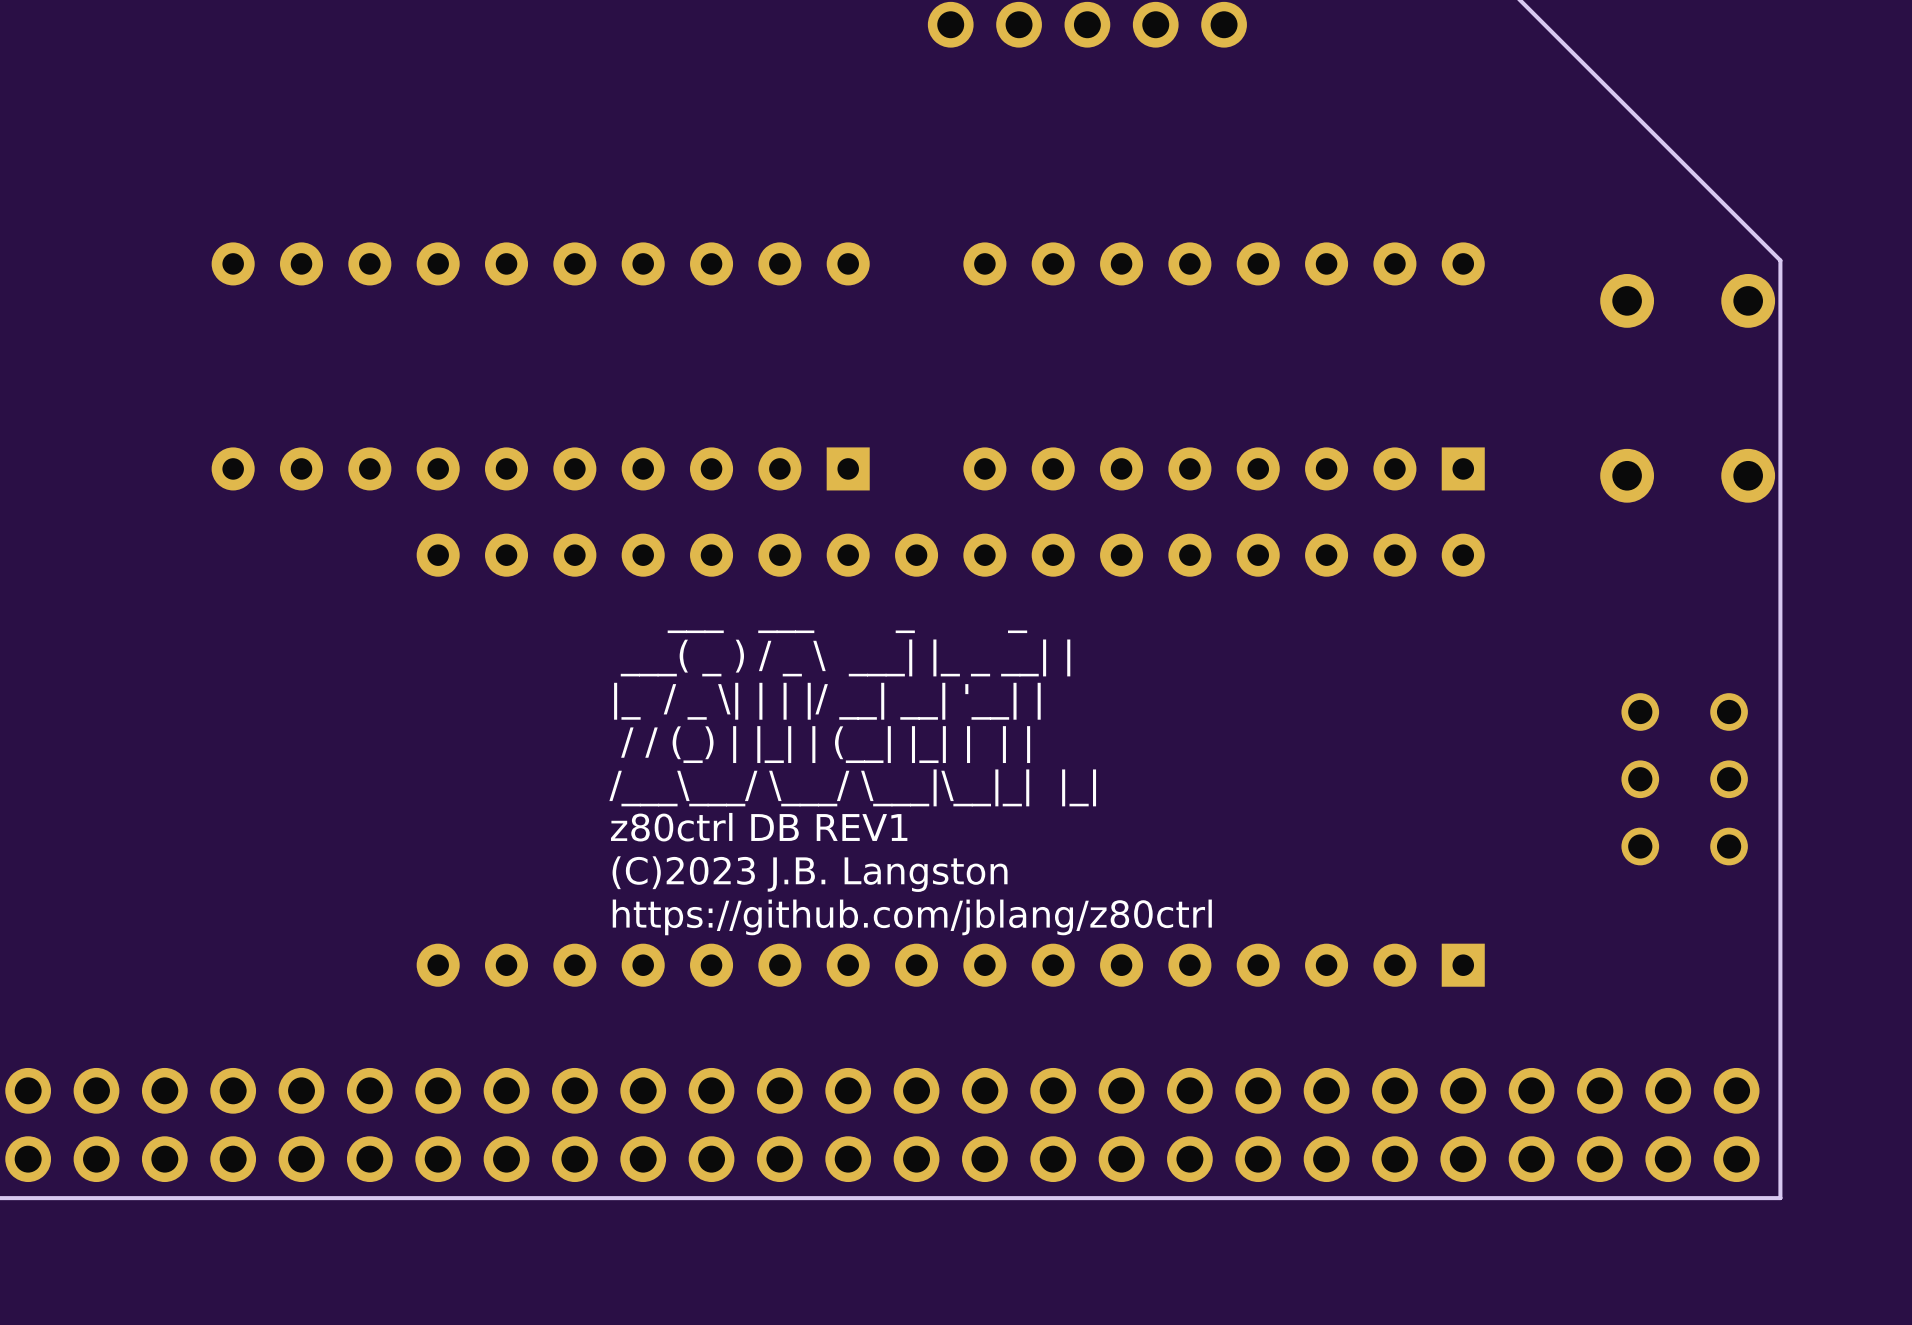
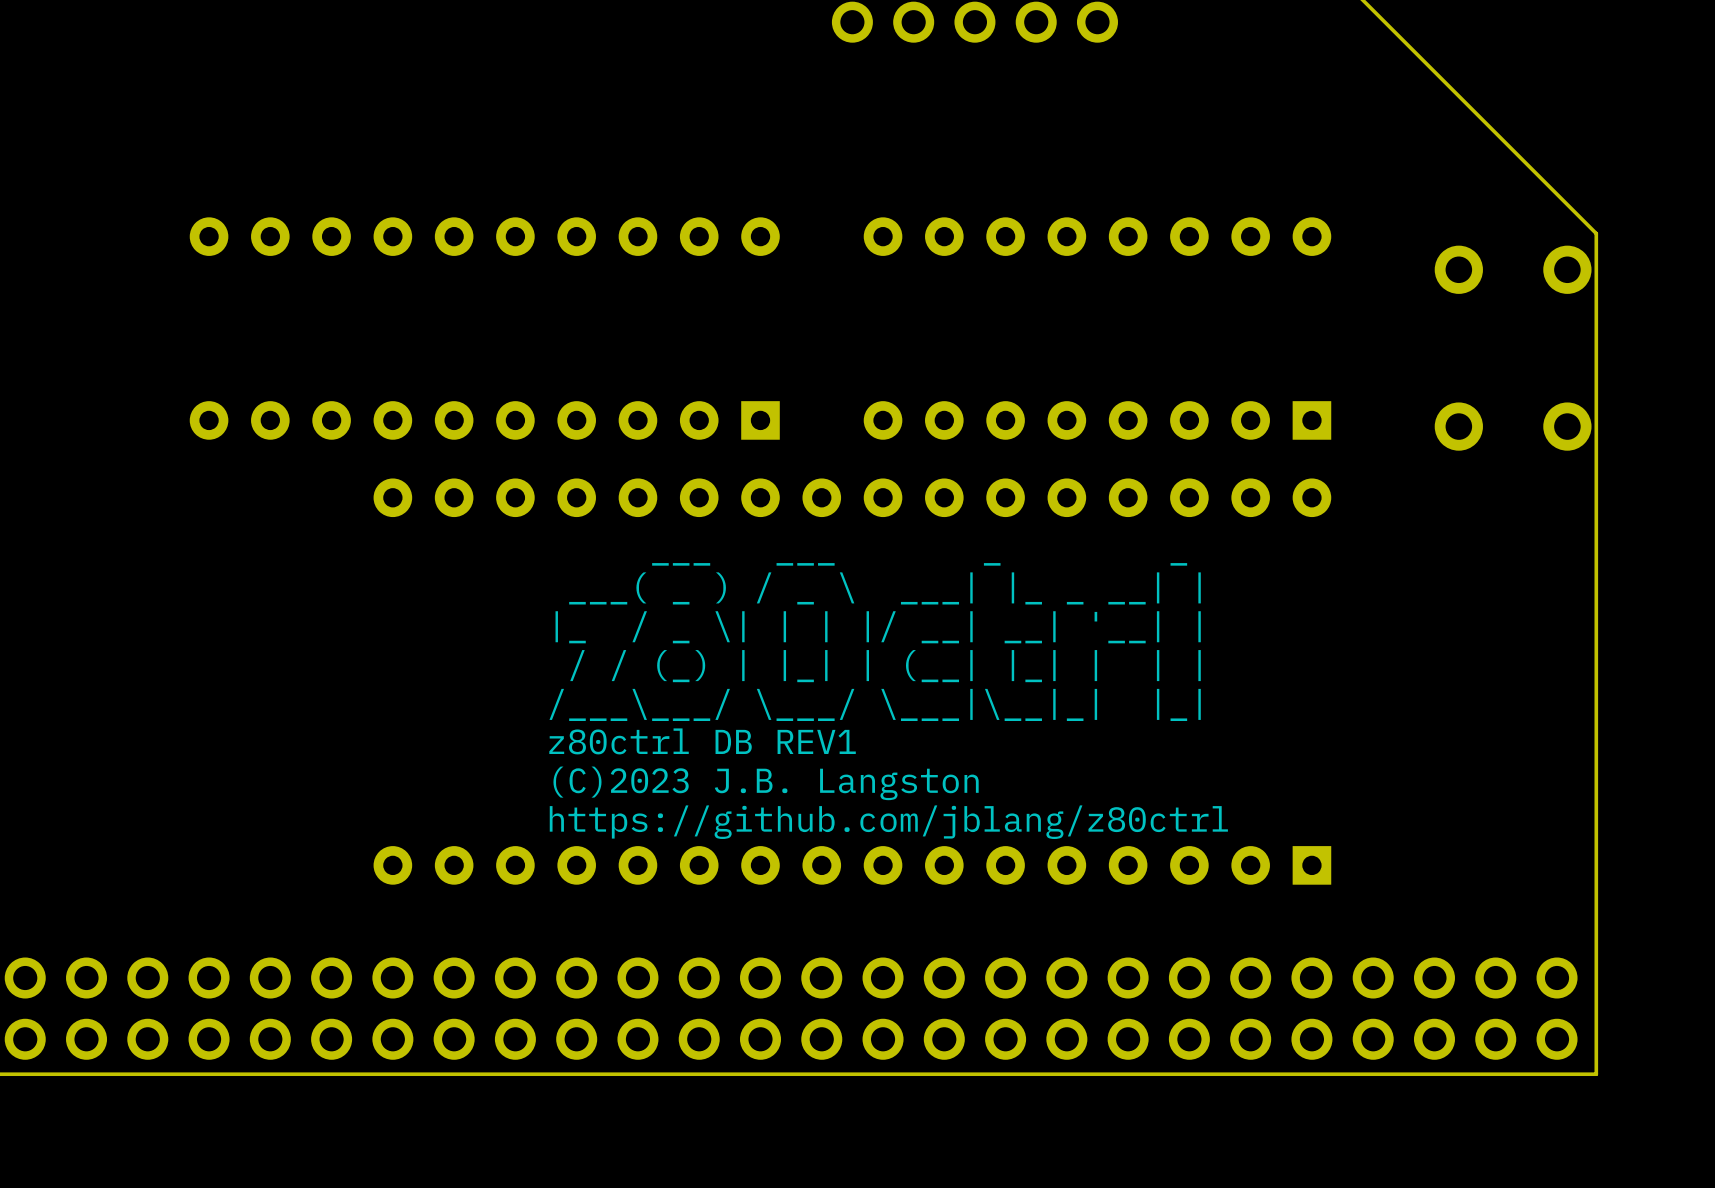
part: (1684, 779) -> none

